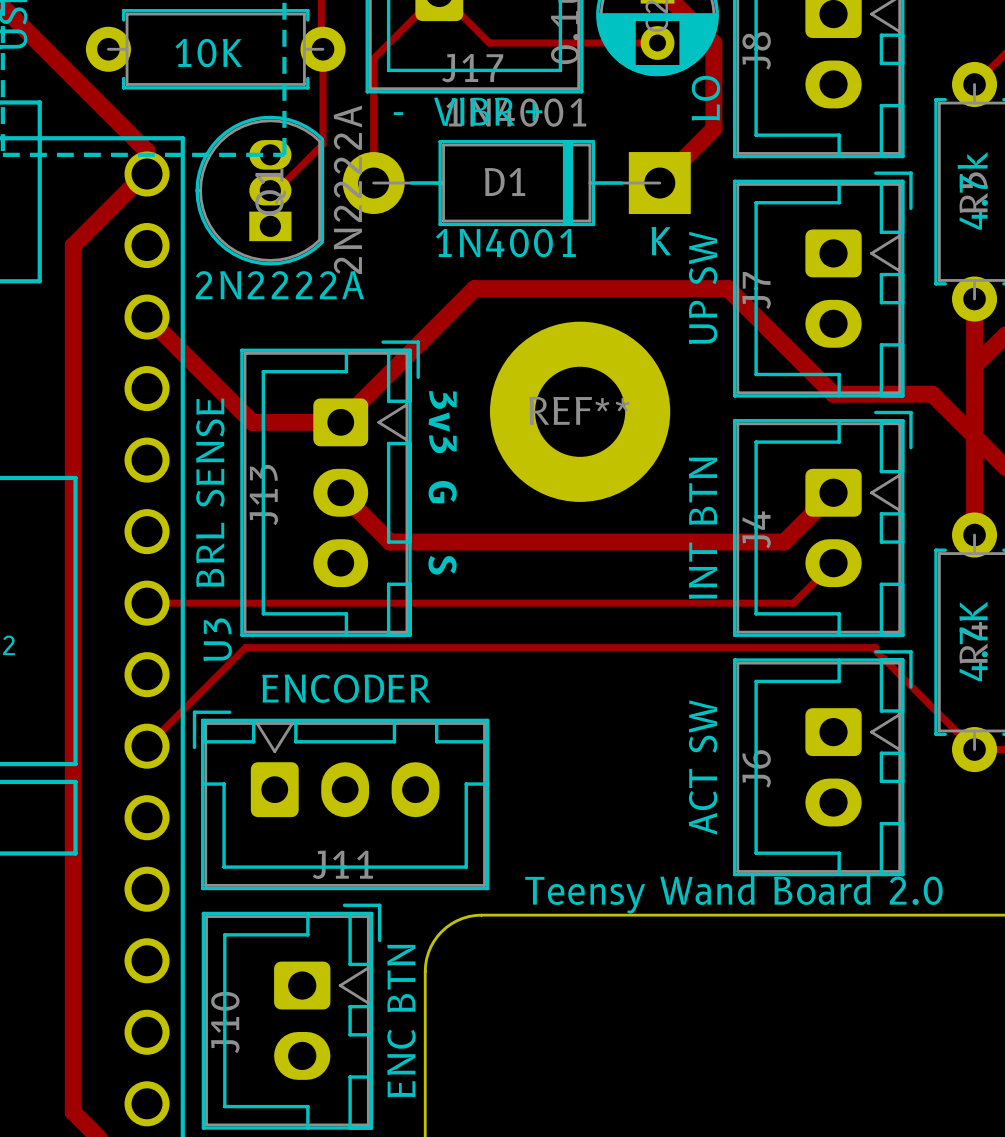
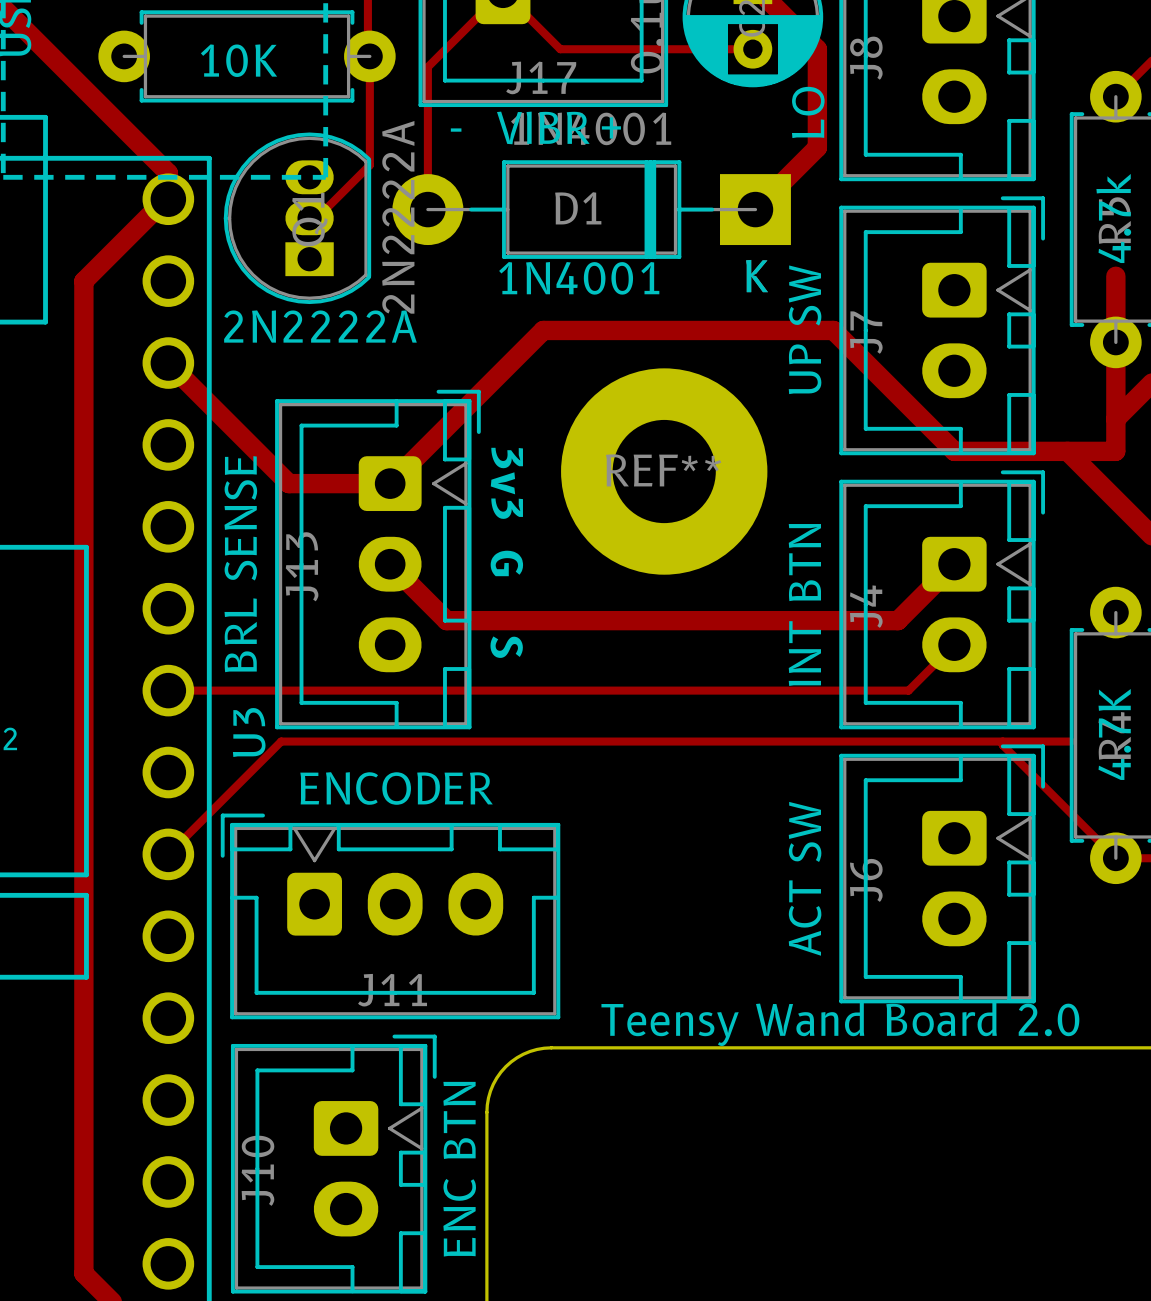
track: none -> (1115, 276) (1115, 342)
track: (974, 393) (974, 535) -> (1115, 451) (1067, 451)
track: none -> (1002, 741) (1071, 741)

